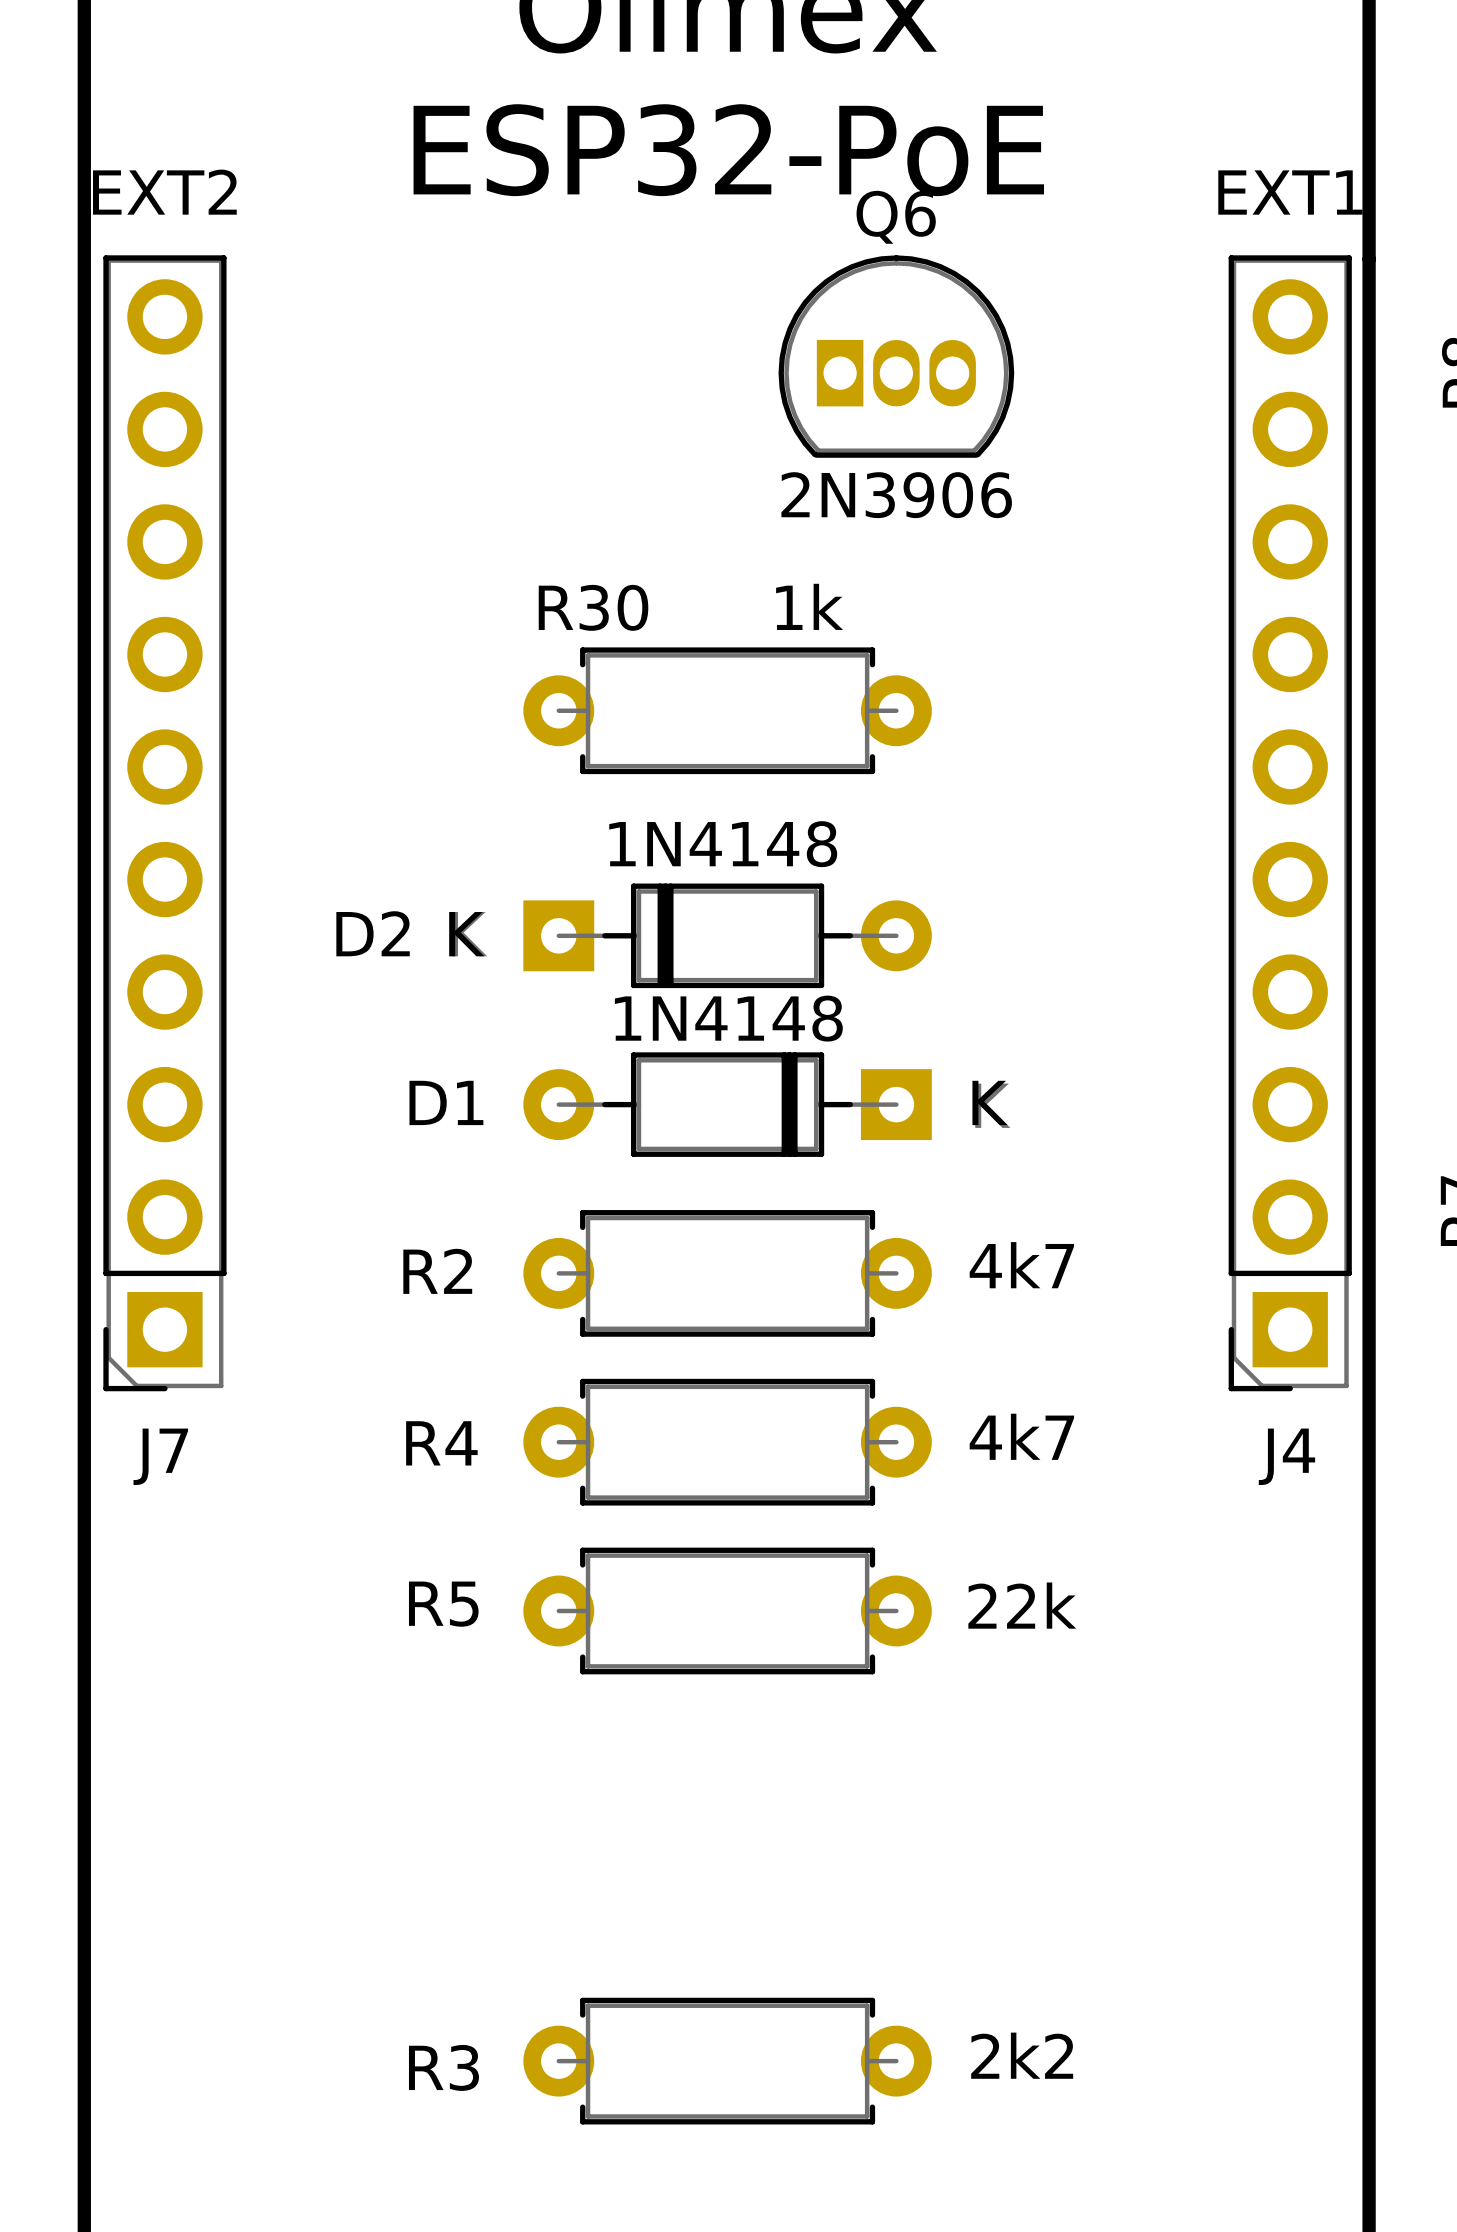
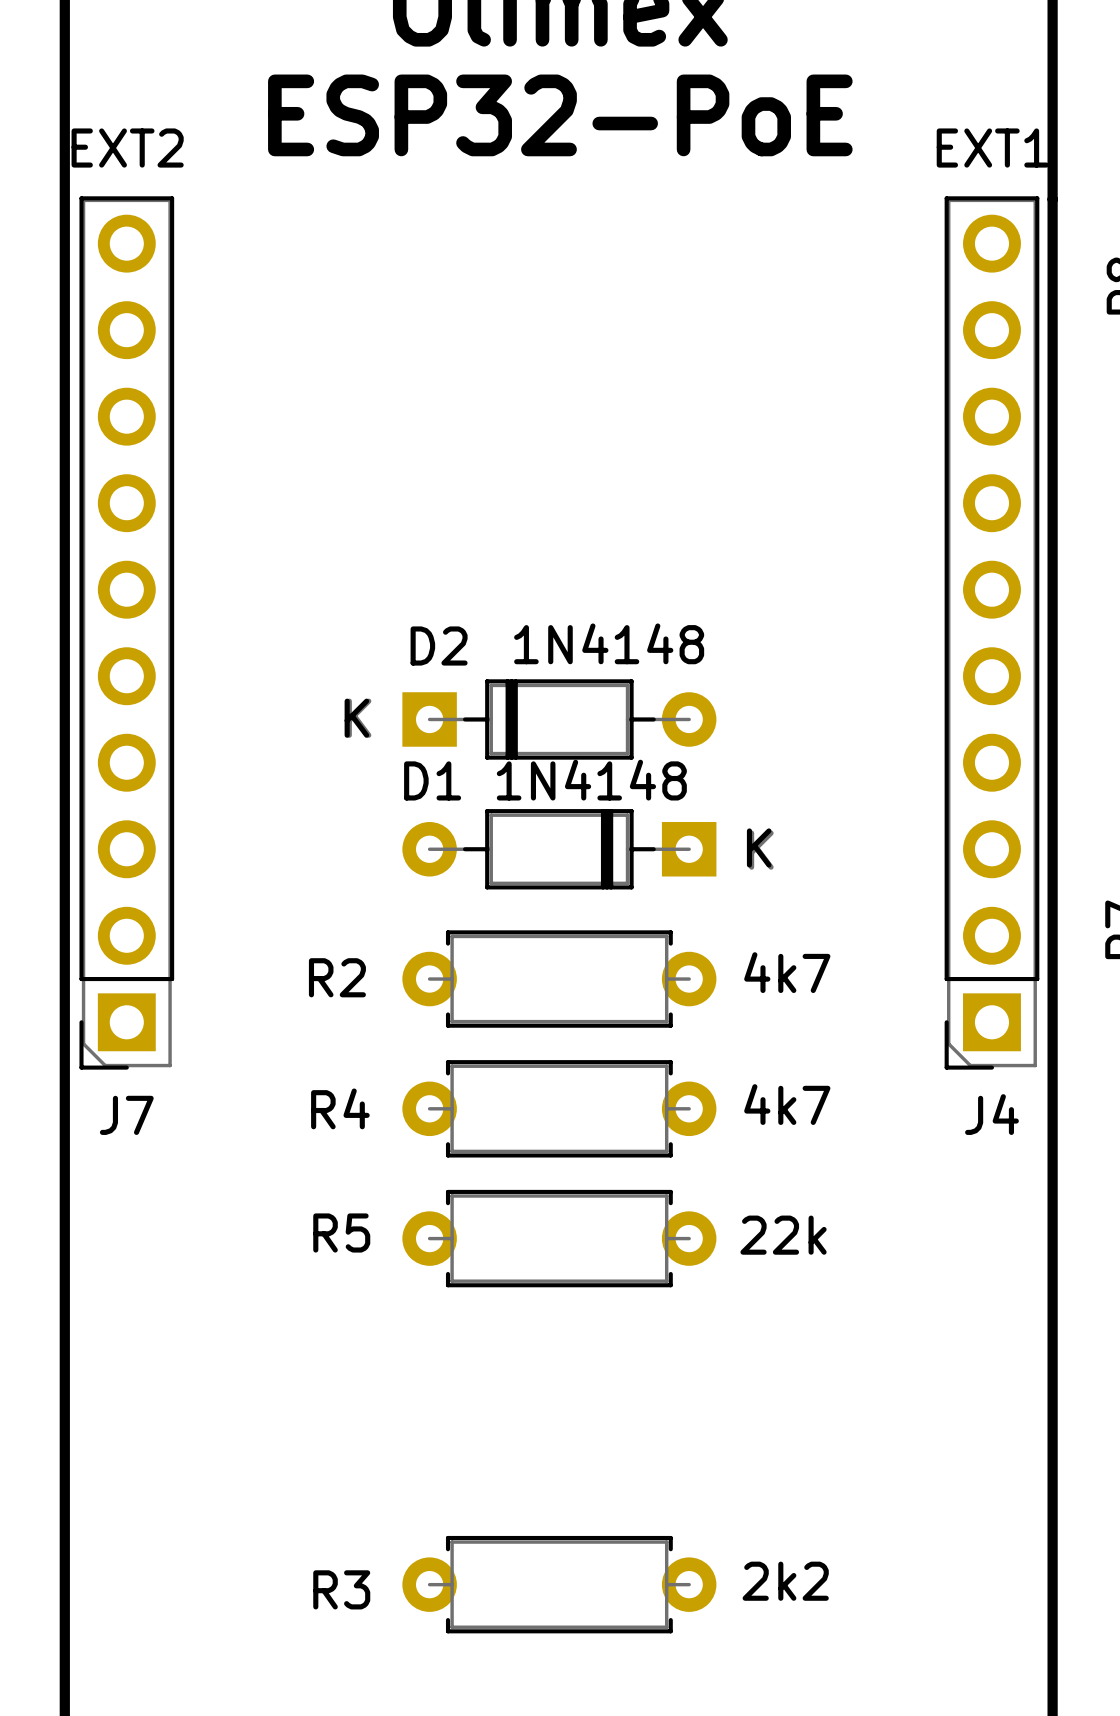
Q6: 2N3906 (896, 356) -> none
R30: 1k (727, 710) -> none
D2 value position: 1N4148 (723, 844) -> 1N4148 (609, 643)
D2 name position: D2 (373, 933) -> D2 (439, 646)
D1 value position: 1N4148 (728, 1018) -> 1N4148 (591, 780)
D1 name position: D1 (446, 1102) -> D1 (432, 780)

